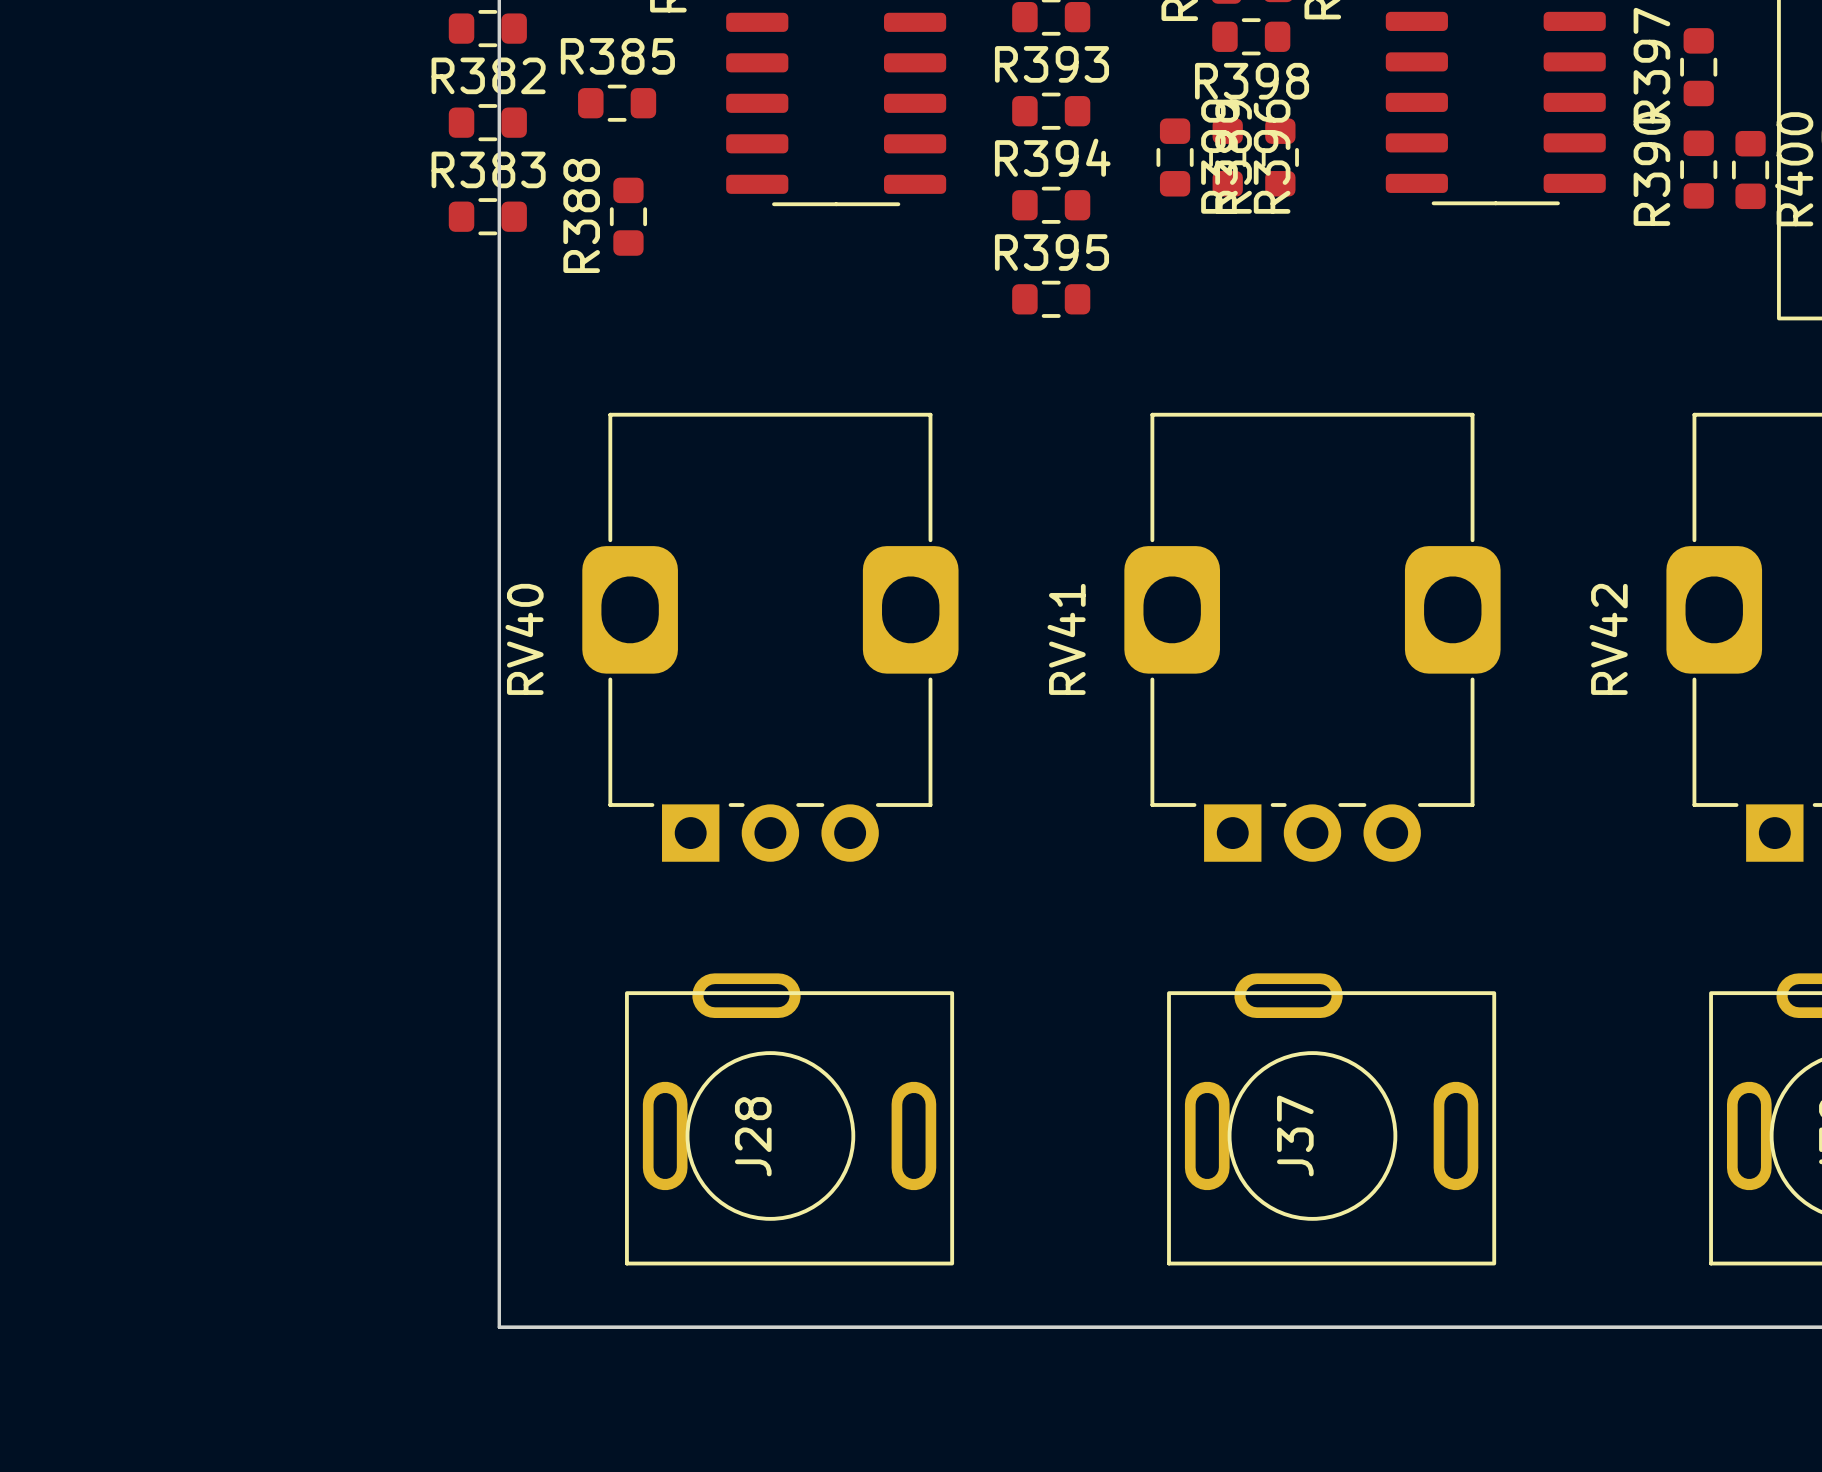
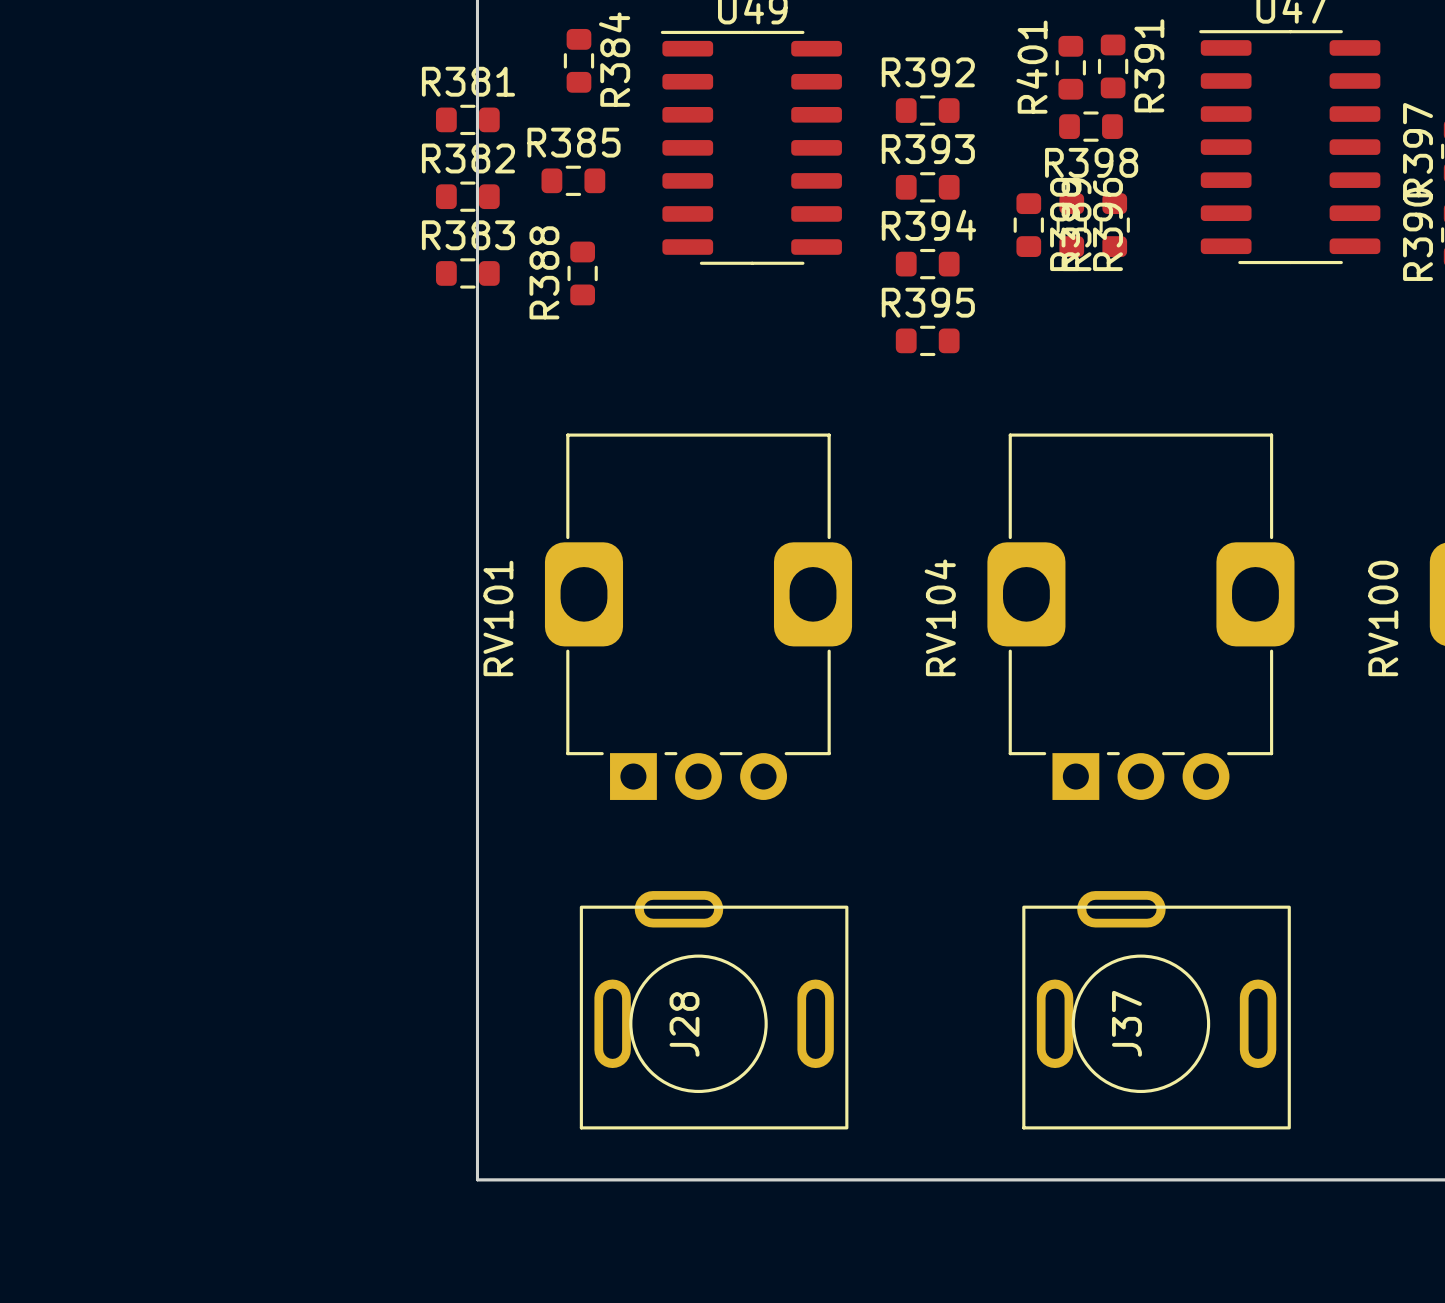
RV40 name: RV40 (524, 639) -> RV101 (498, 618)
RV41 name: RV41 (1066, 639) -> RV104 (940, 617)
RV42 name: RV42 (1608, 639) -> RV100 (1383, 618)

